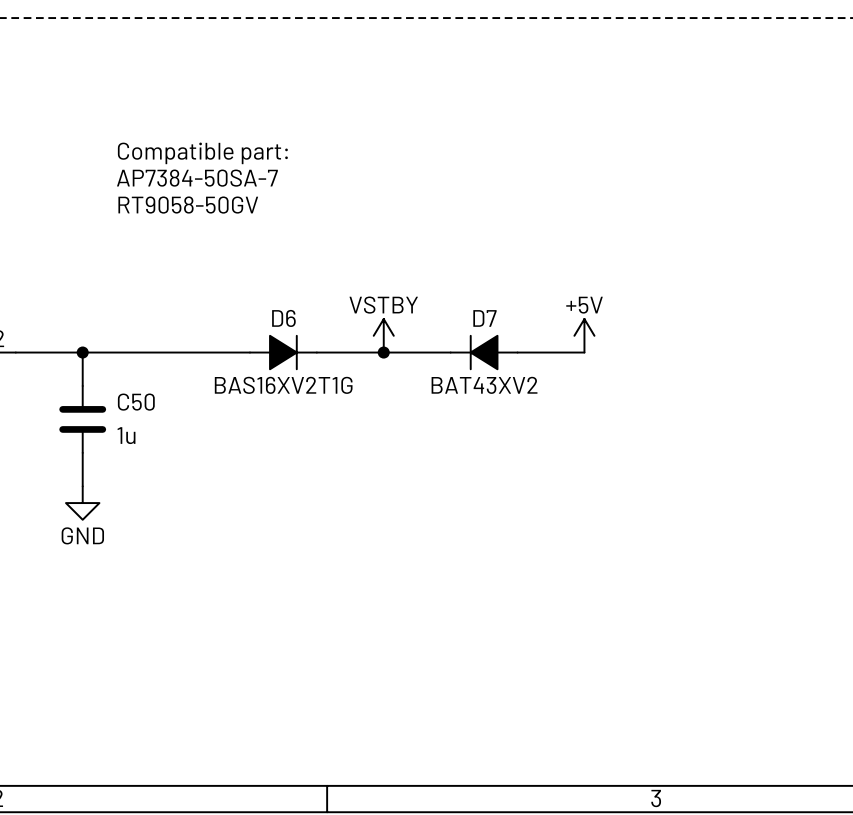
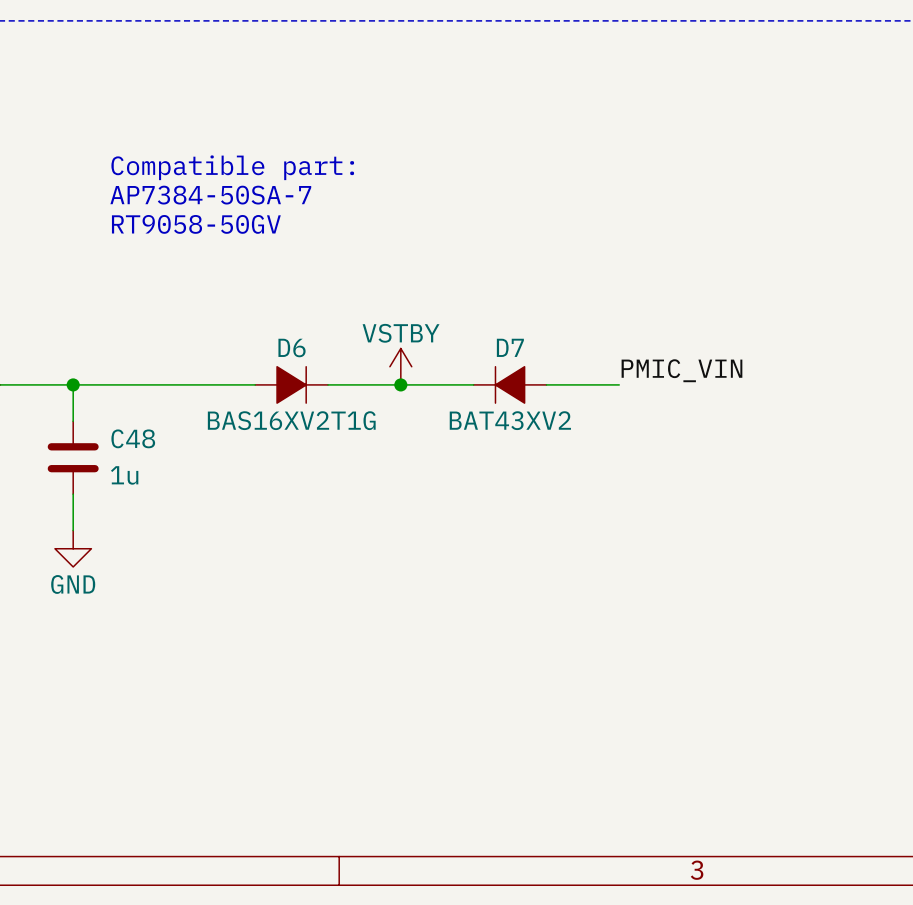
power symbol: +5V (584, 335) -> none
label: none -> PMIC_VIN (681, 370)
C50 name: C50 (136, 402) -> C48 (133, 438)

